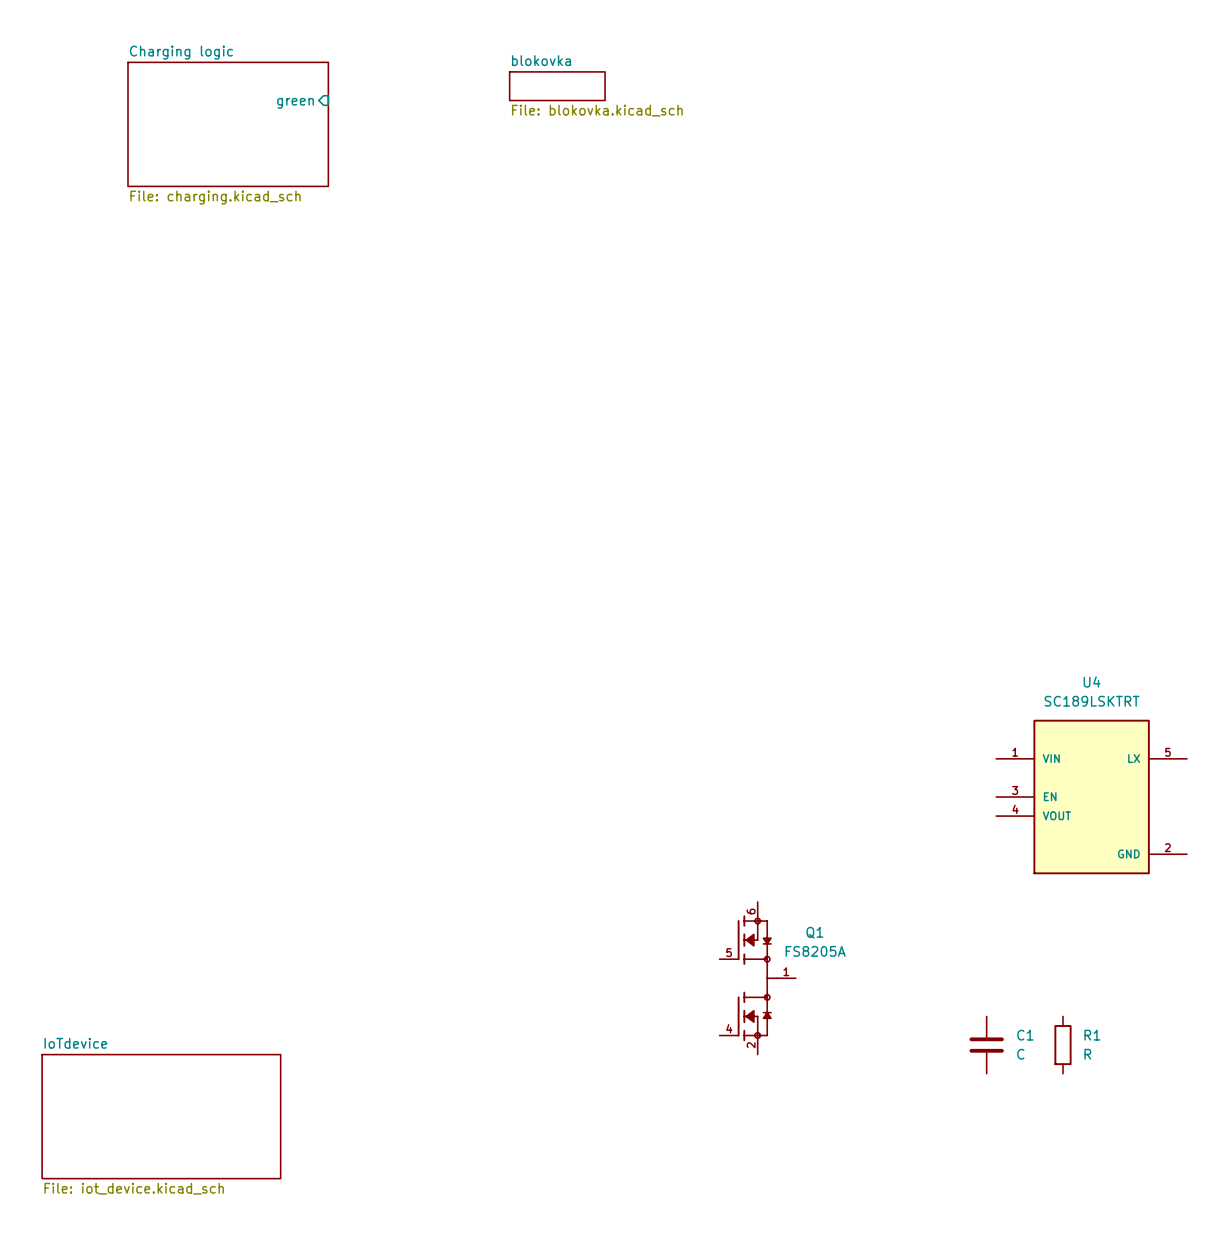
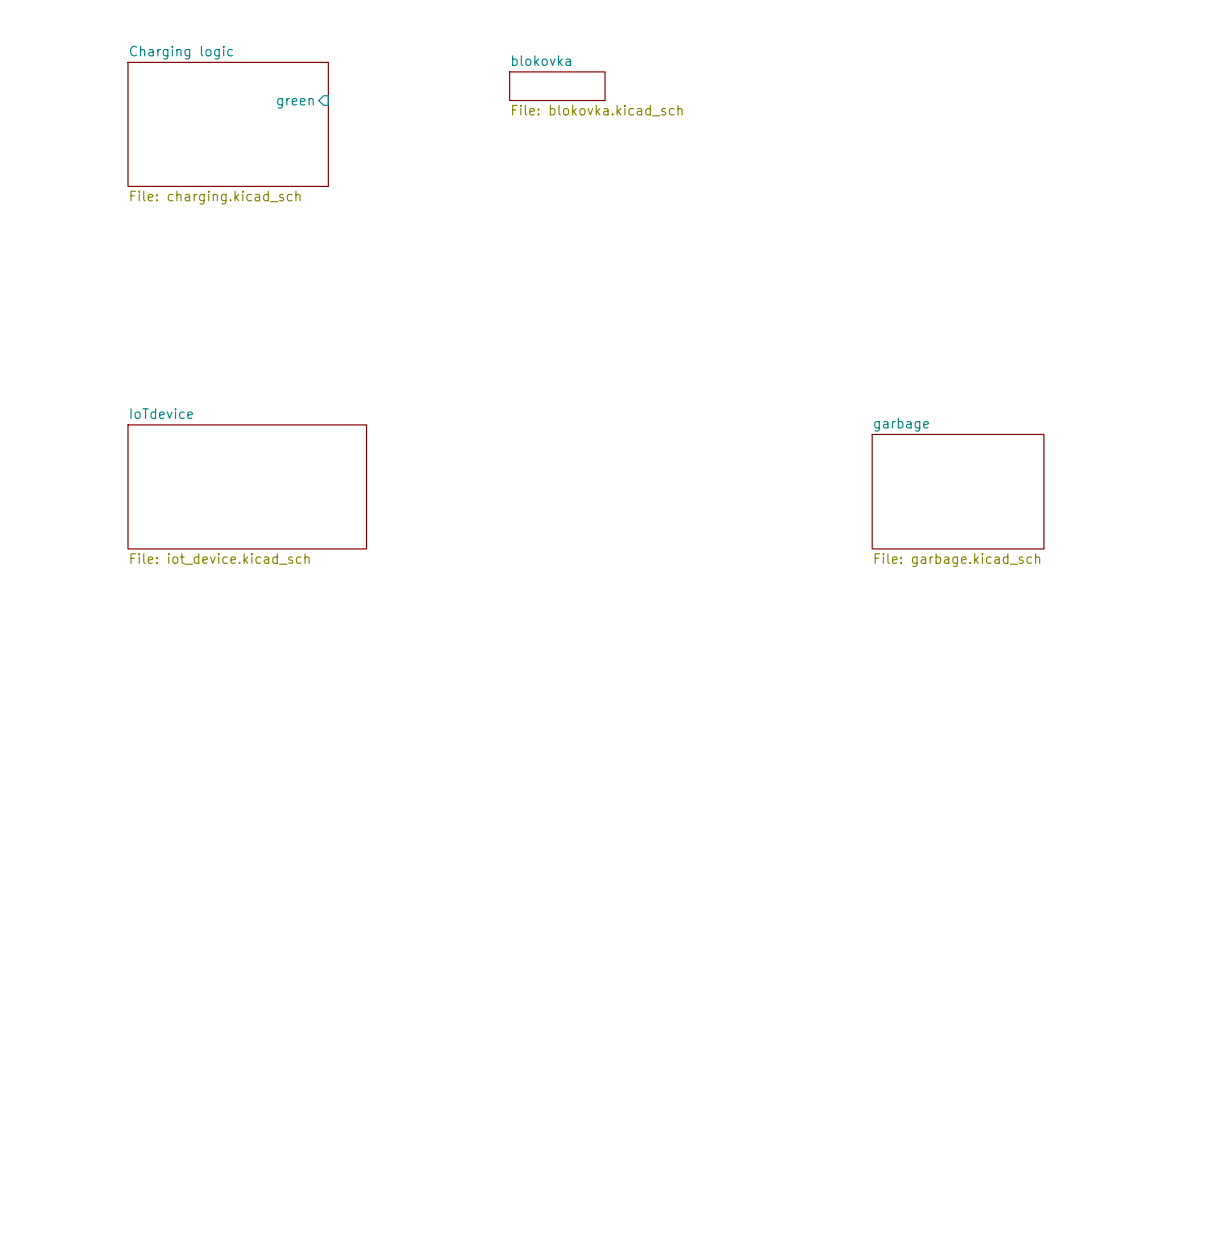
sheet IoTdevice: none -> File: iot_device.kicad_sch (247, 486)
sheet garbage: none -> File: garbage.kicad_sch (958, 491)
U4: SC189LSKTRT (1091, 797) -> none
Q1: FS8205A (757, 978) -> none
C1: C (986, 1045) -> none
R1: R (1062, 1045) -> none
sheet IoTdevice: File: iot_device.kicad_sch (161, 1116) -> none

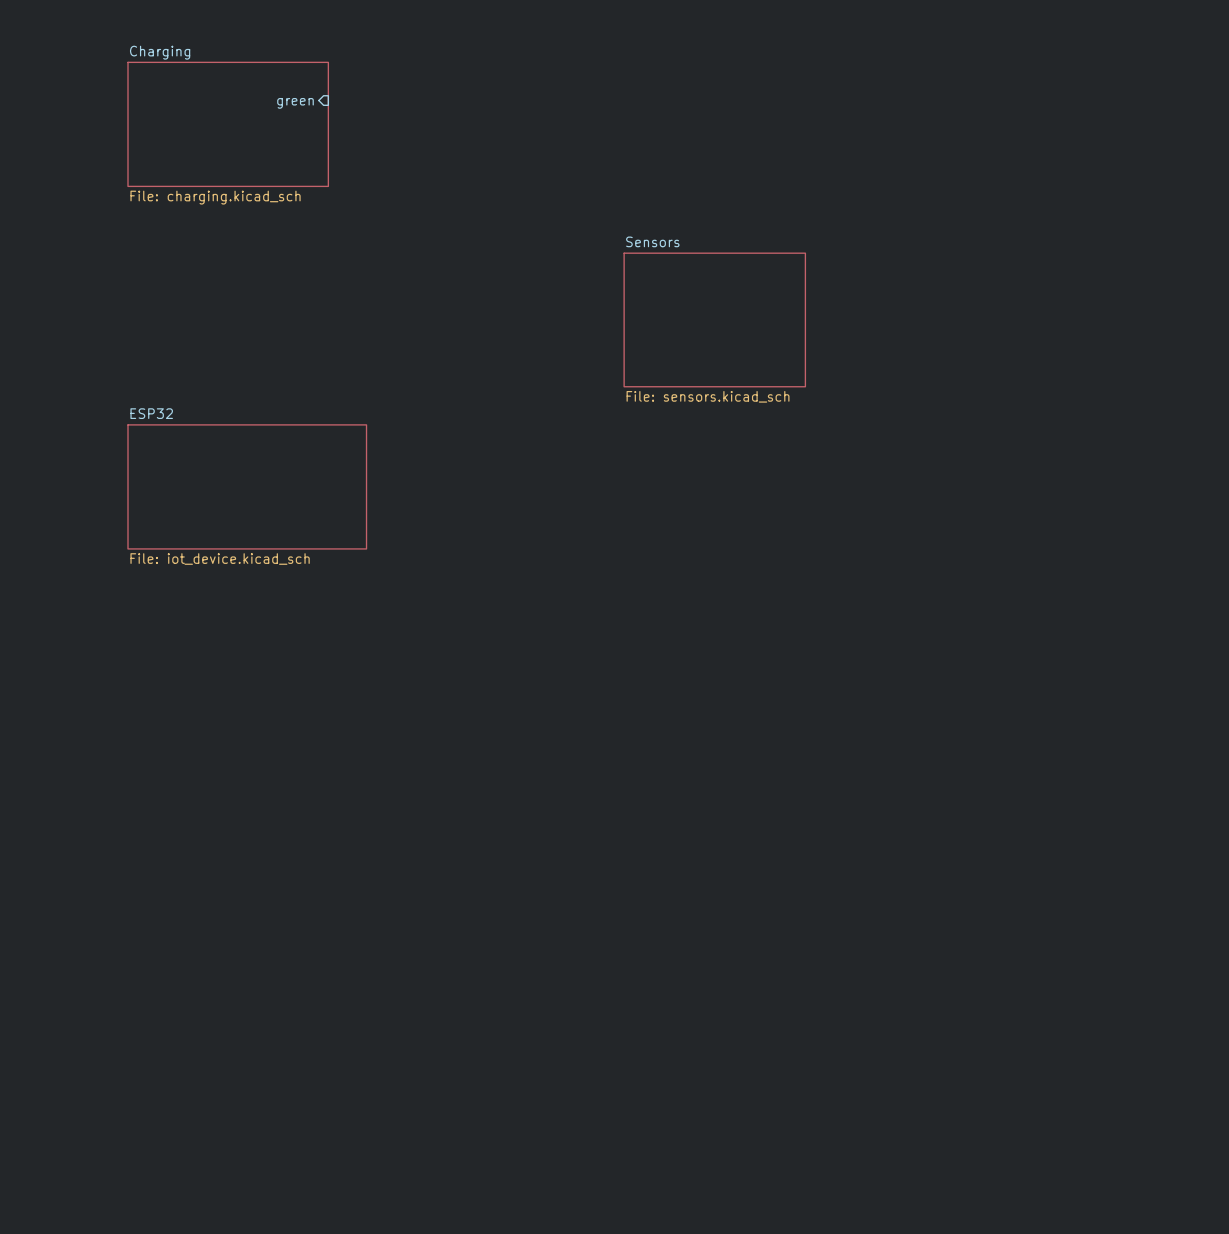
sheet Charging logic name: Charging logic (181, 52) -> Charging (160, 52)
sheet blokovka: File: blokovka.kicad_sch (557, 86) -> none
sheet Sensors: none -> File: sensors.kicad_sch (714, 319)
sheet IoTdevice name: IoTdevice (161, 413) -> ESP32 (151, 413)
sheet garbage: File: garbage.kicad_sch (958, 491) -> none

